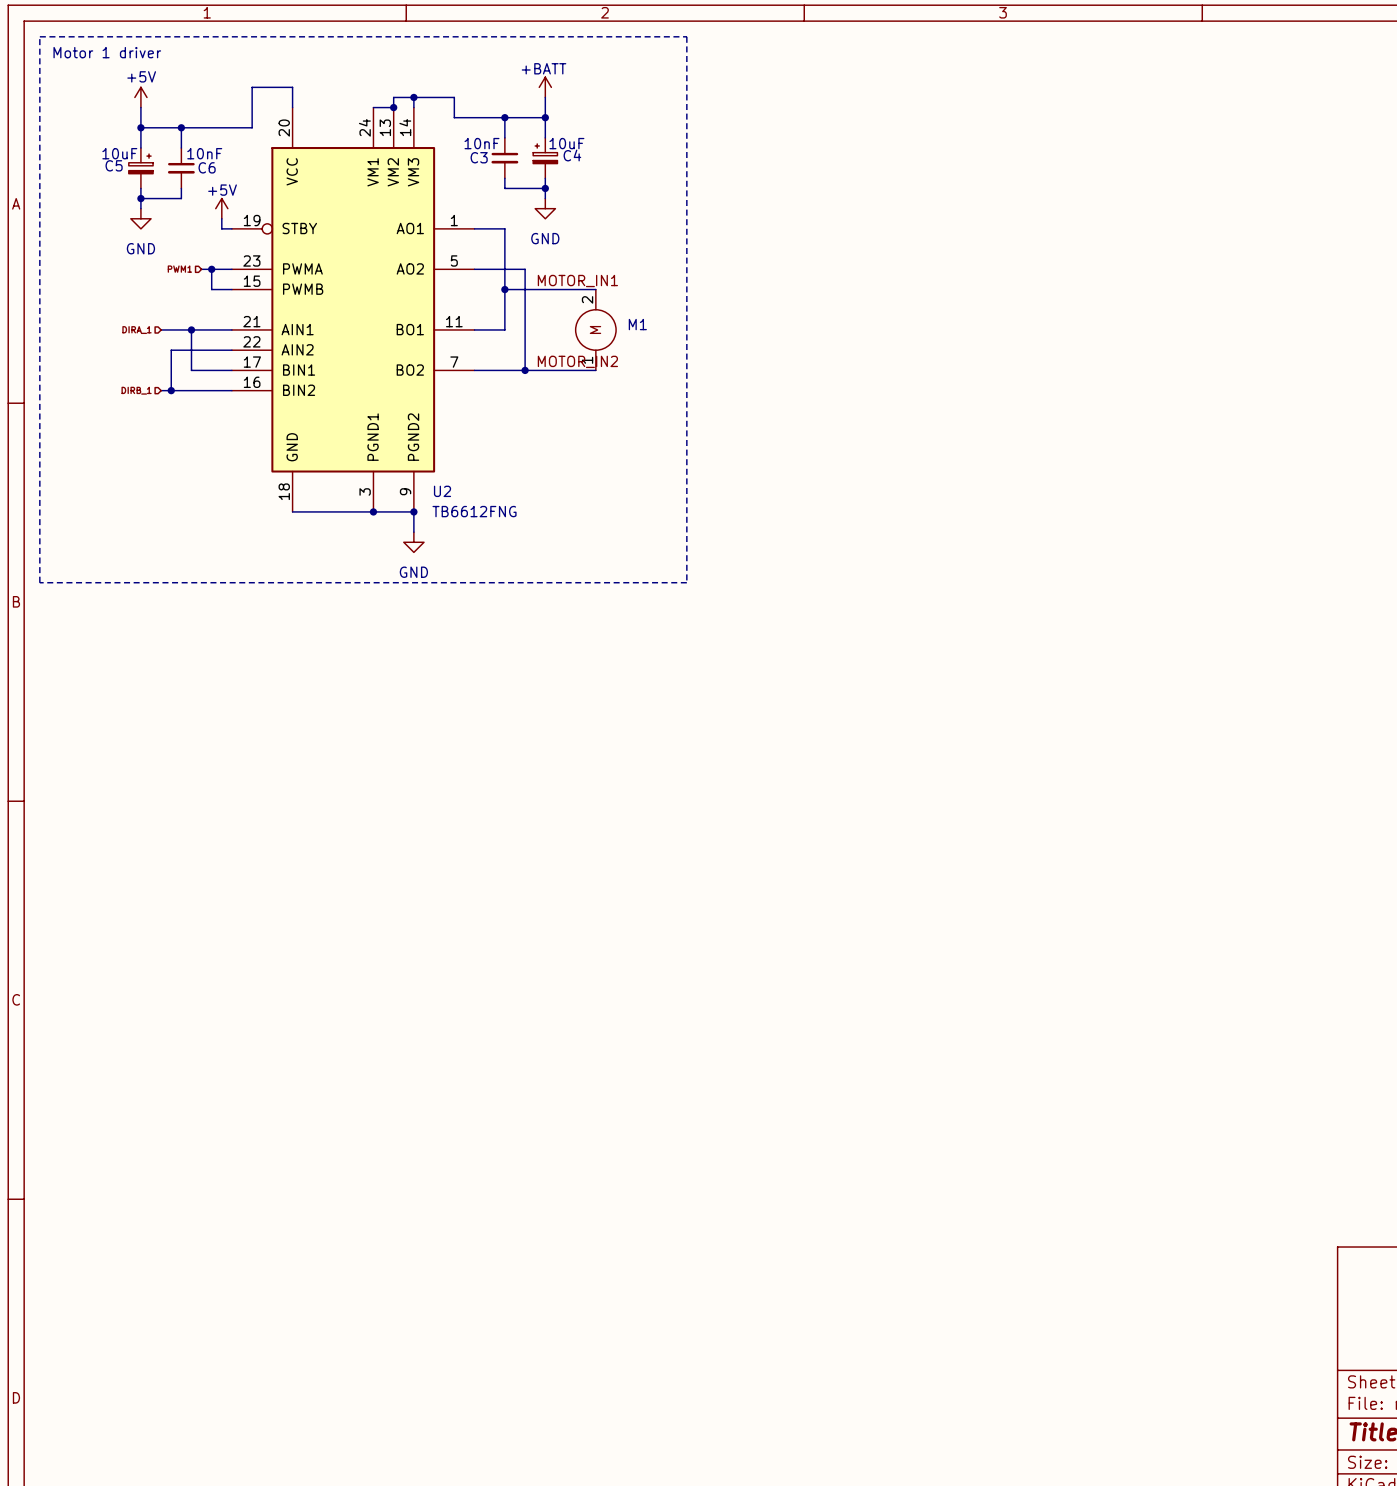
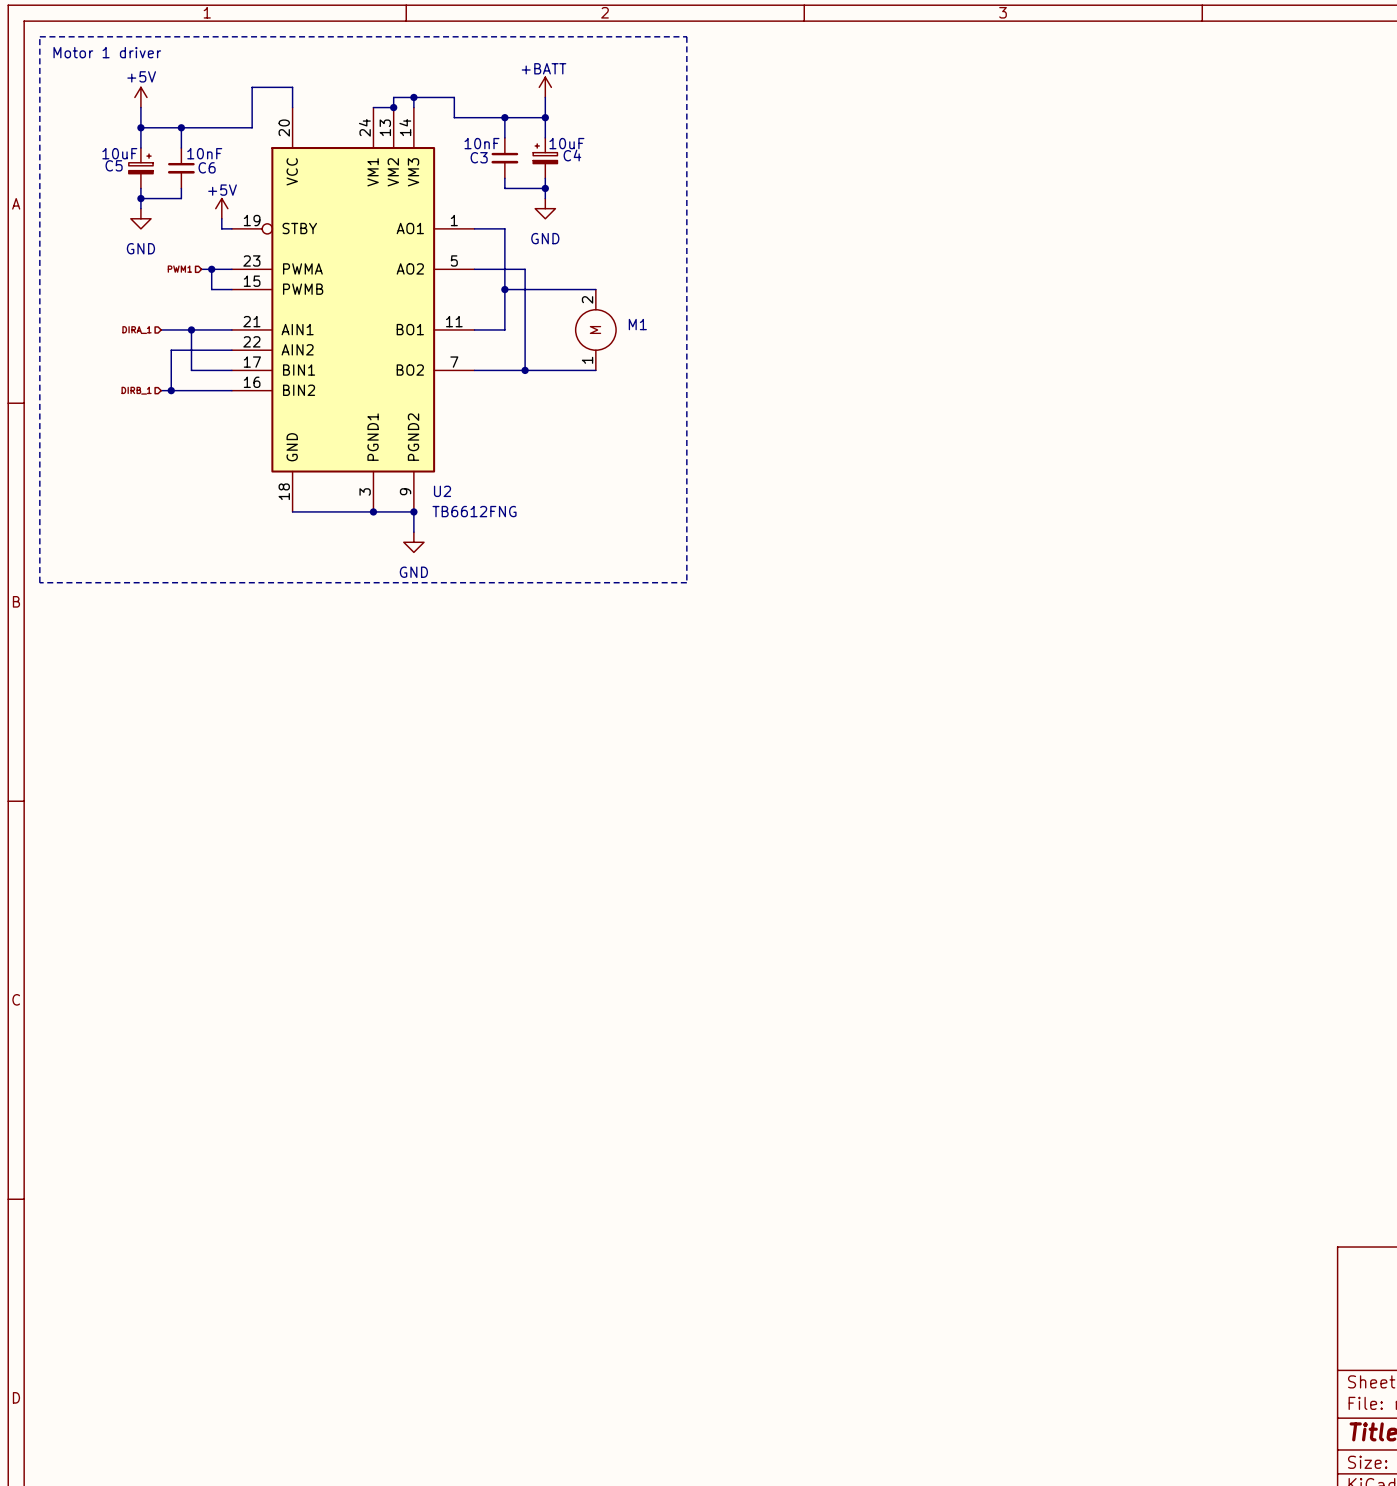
label: MOTOR_IN1 (577, 281) -> none
label: MOTOR_IN2 (577, 361) -> none

